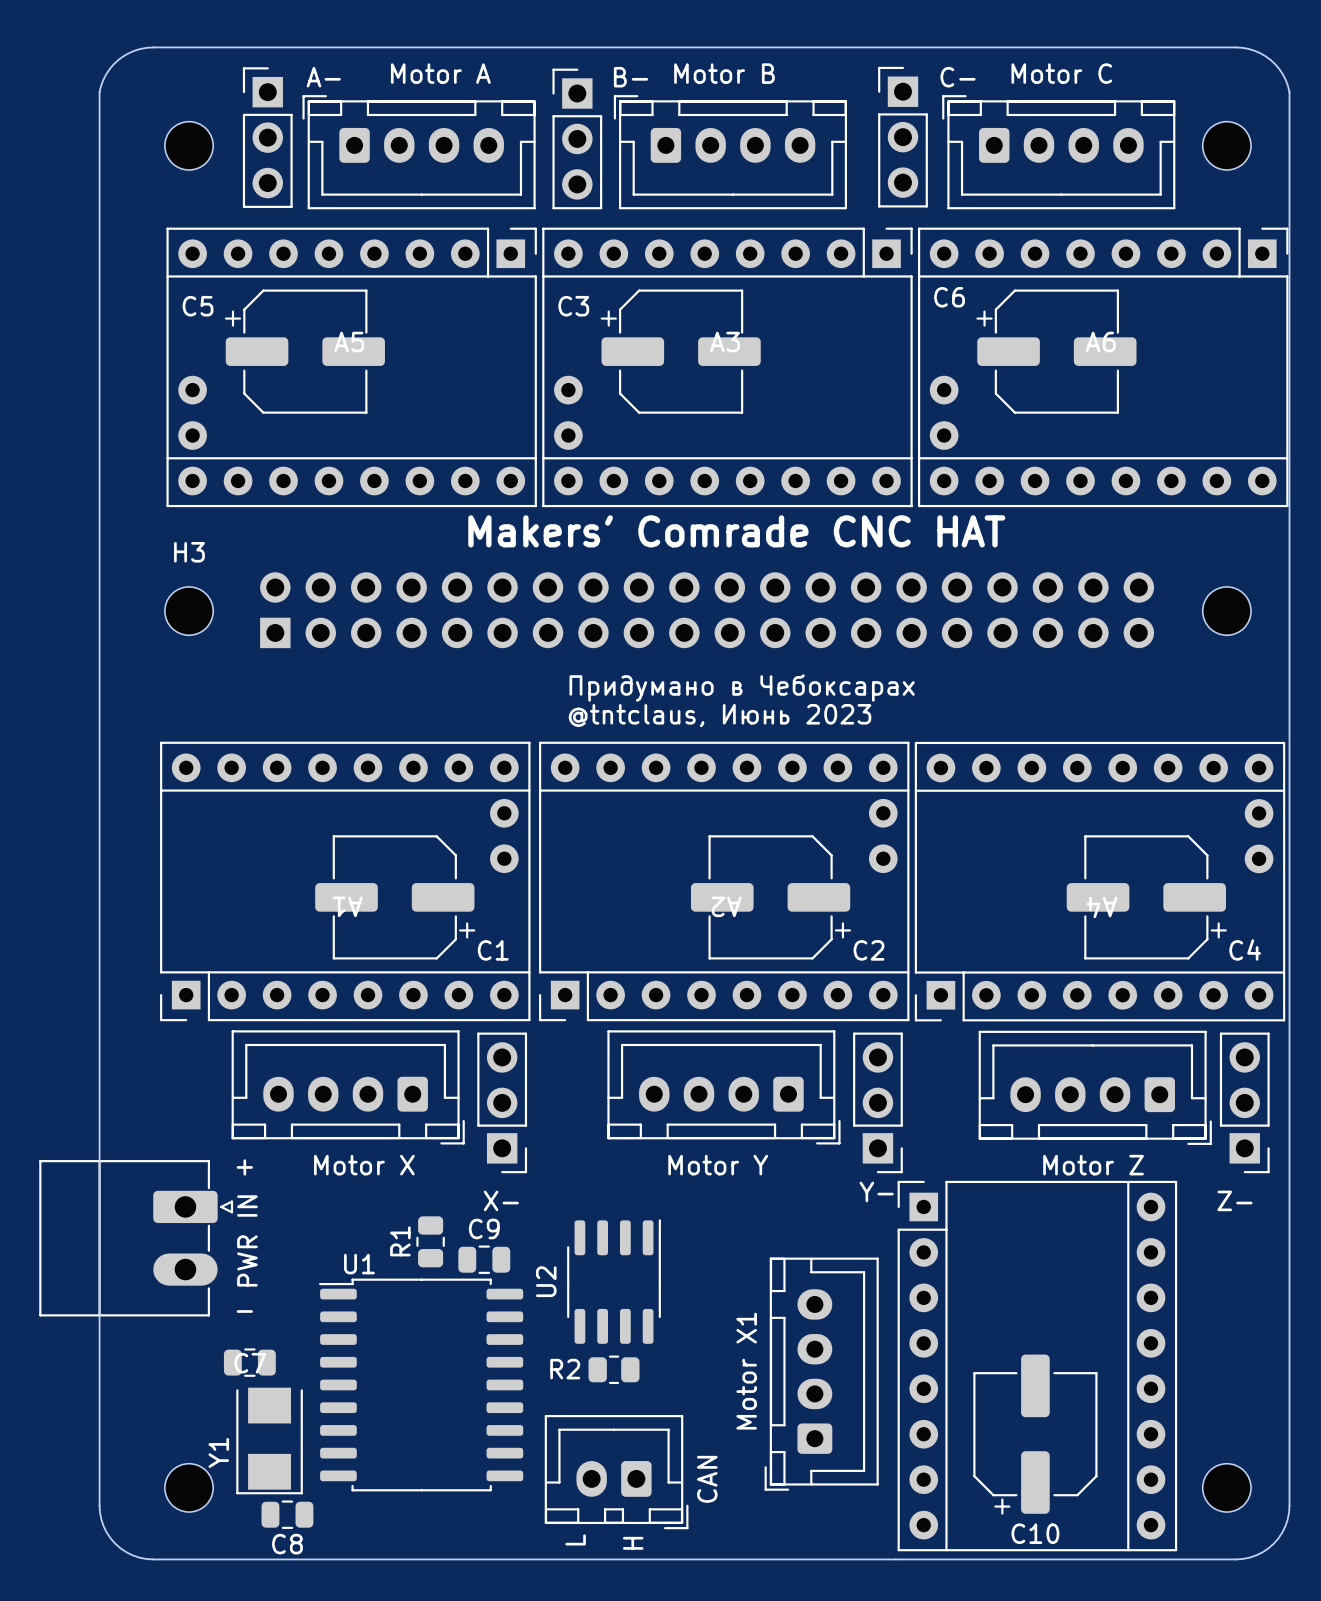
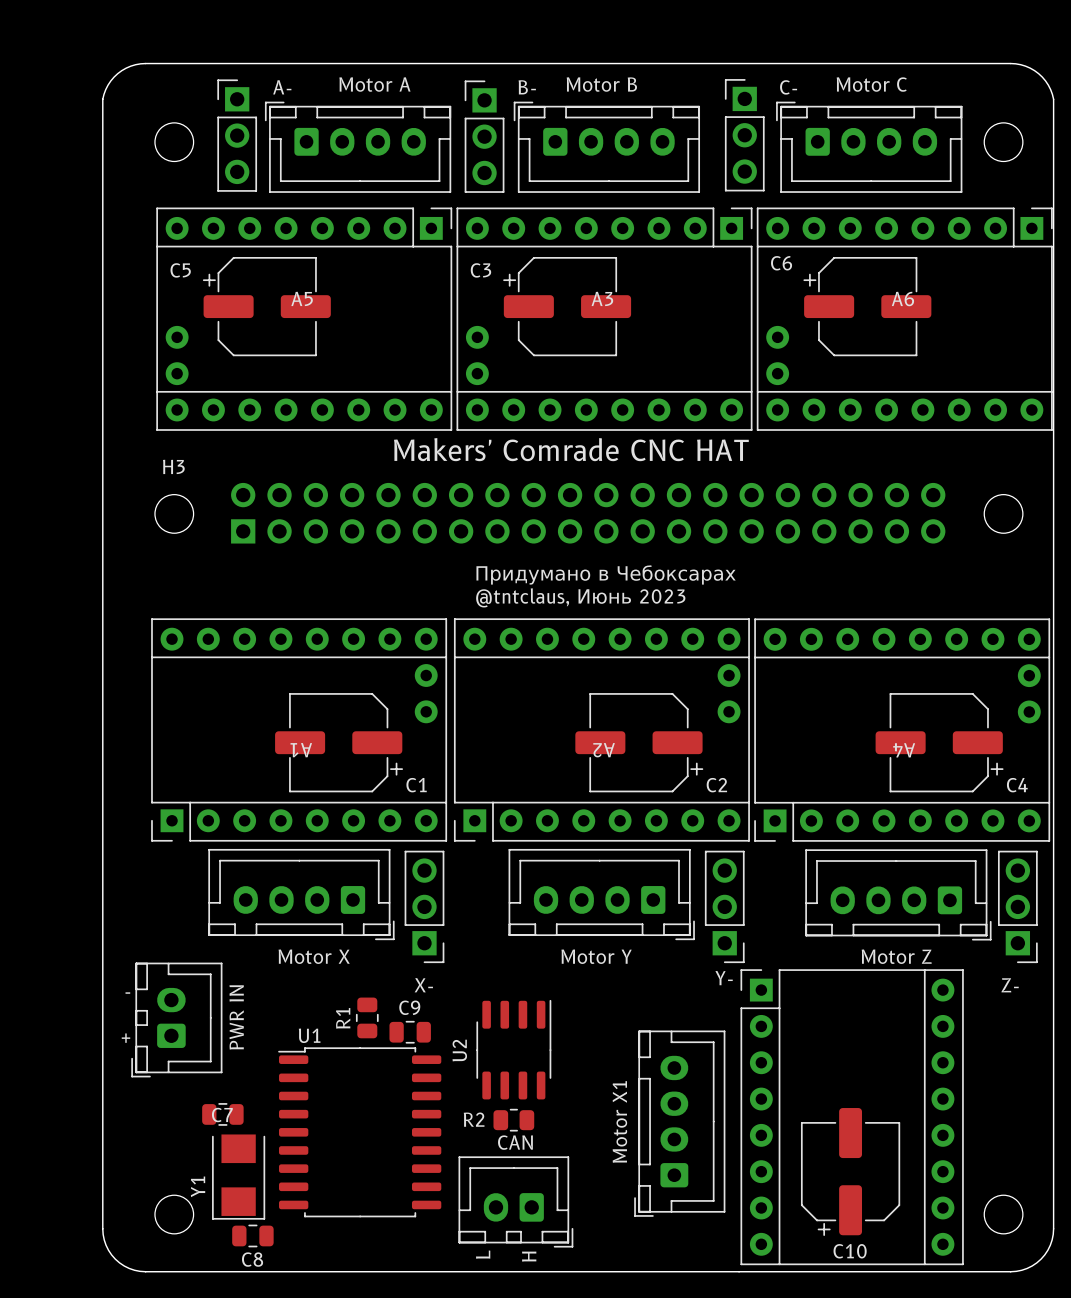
text rotation: 0° (244, 1167) -> 180° (125, 1038)
text position: + (244, 1167) -> + (125, 1038)
part: PWR IN (136, 1238) -> none
part: none -> PWR IN (176, 1020)
text rotation: 0° (244, 1311) -> 180° (127, 993)
text position: - (244, 1311) -> - (127, 993)
part value rotation: 0° (707, 1479) -> 90° clockwise (515, 1142)
part value position: CAN (707, 1479) -> CAN (515, 1142)

